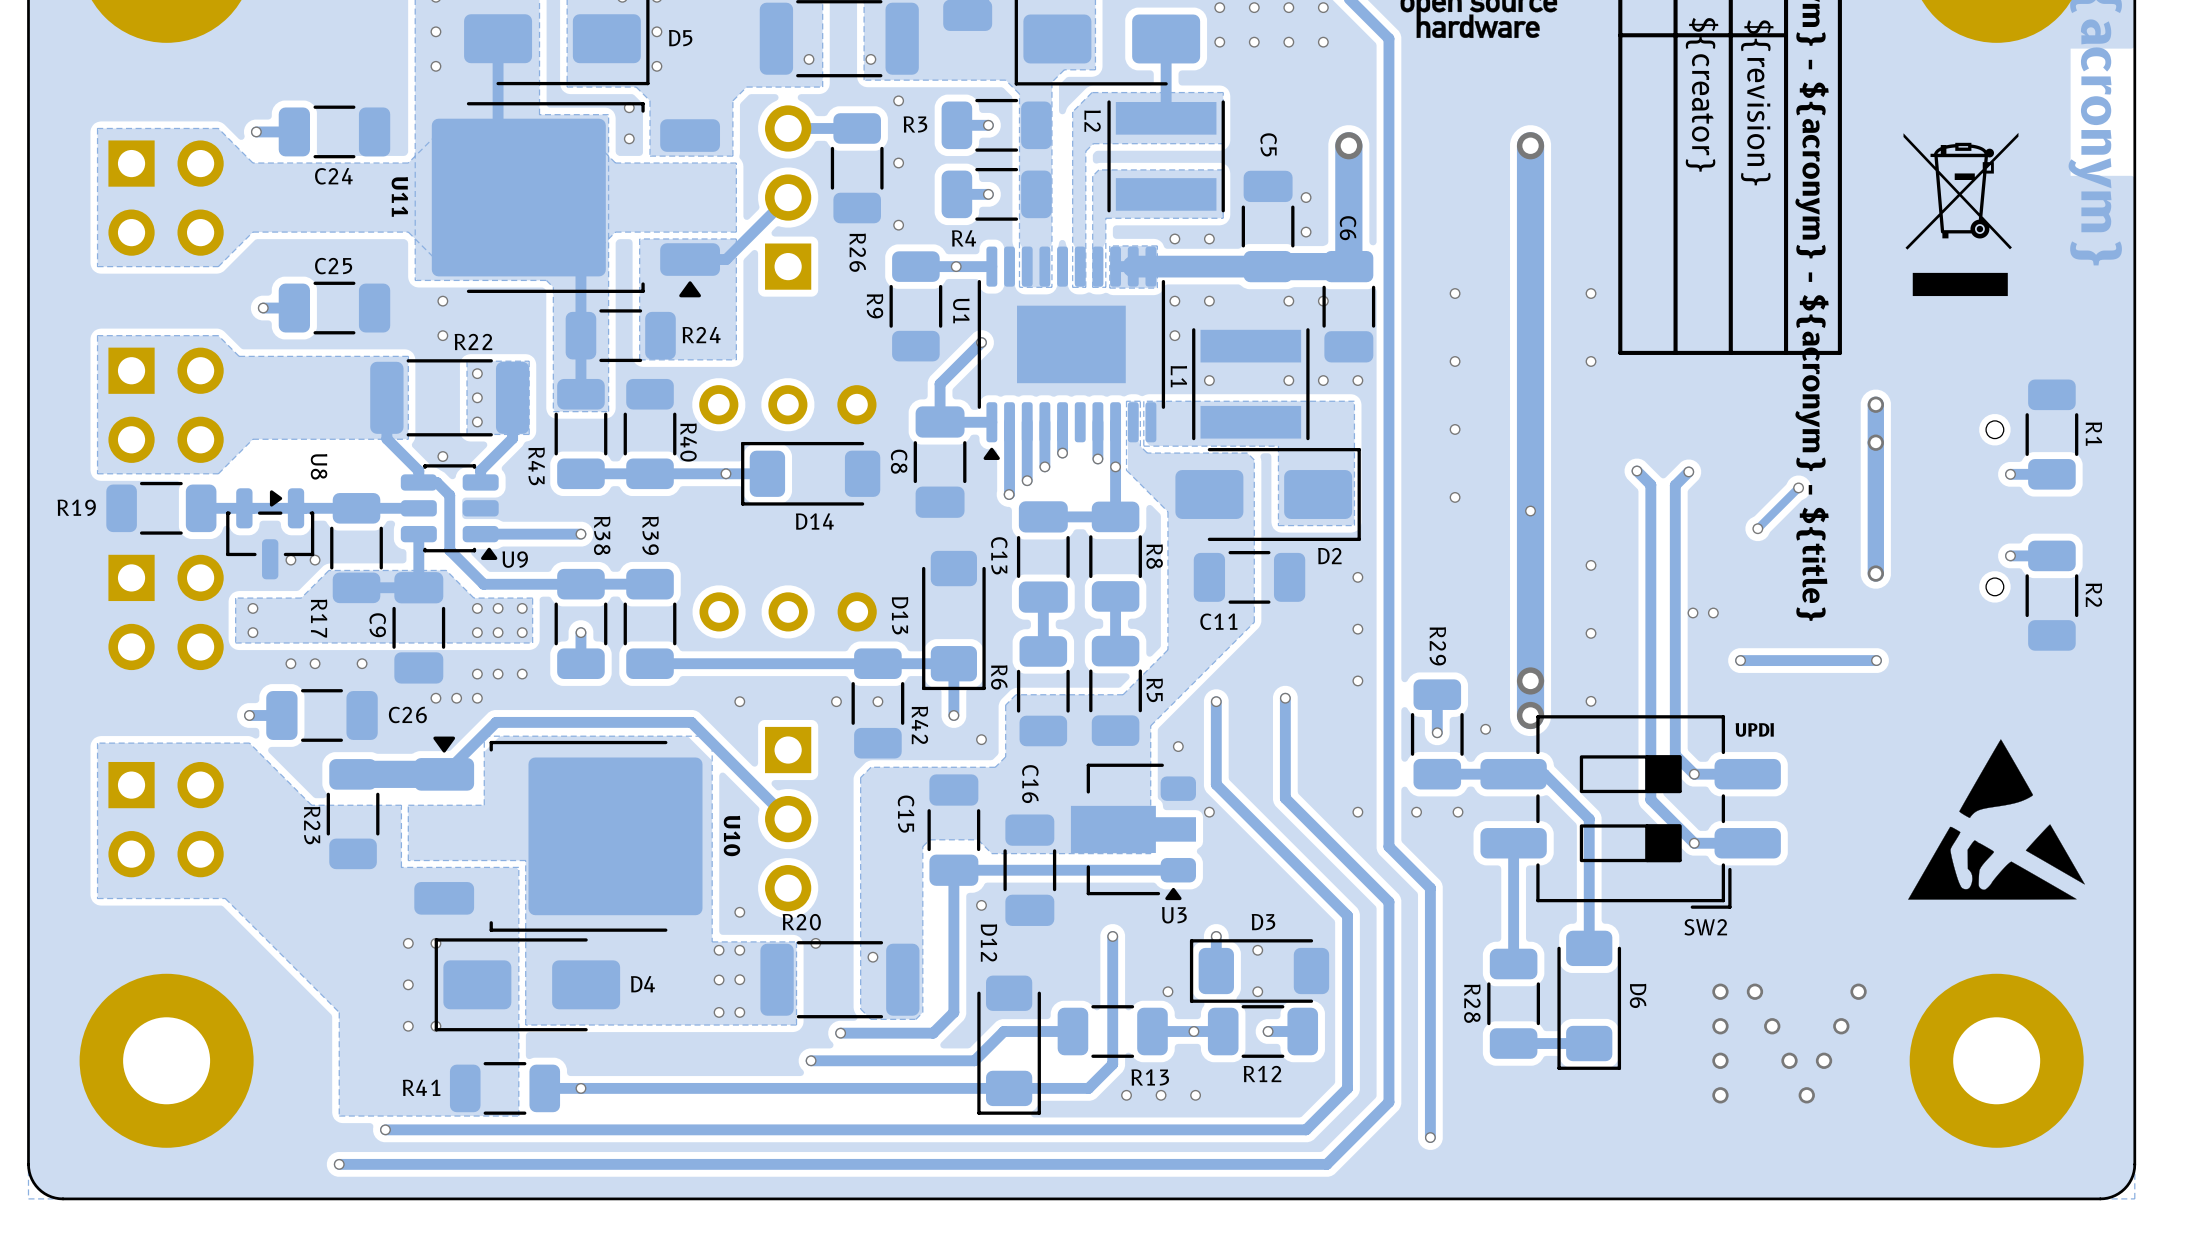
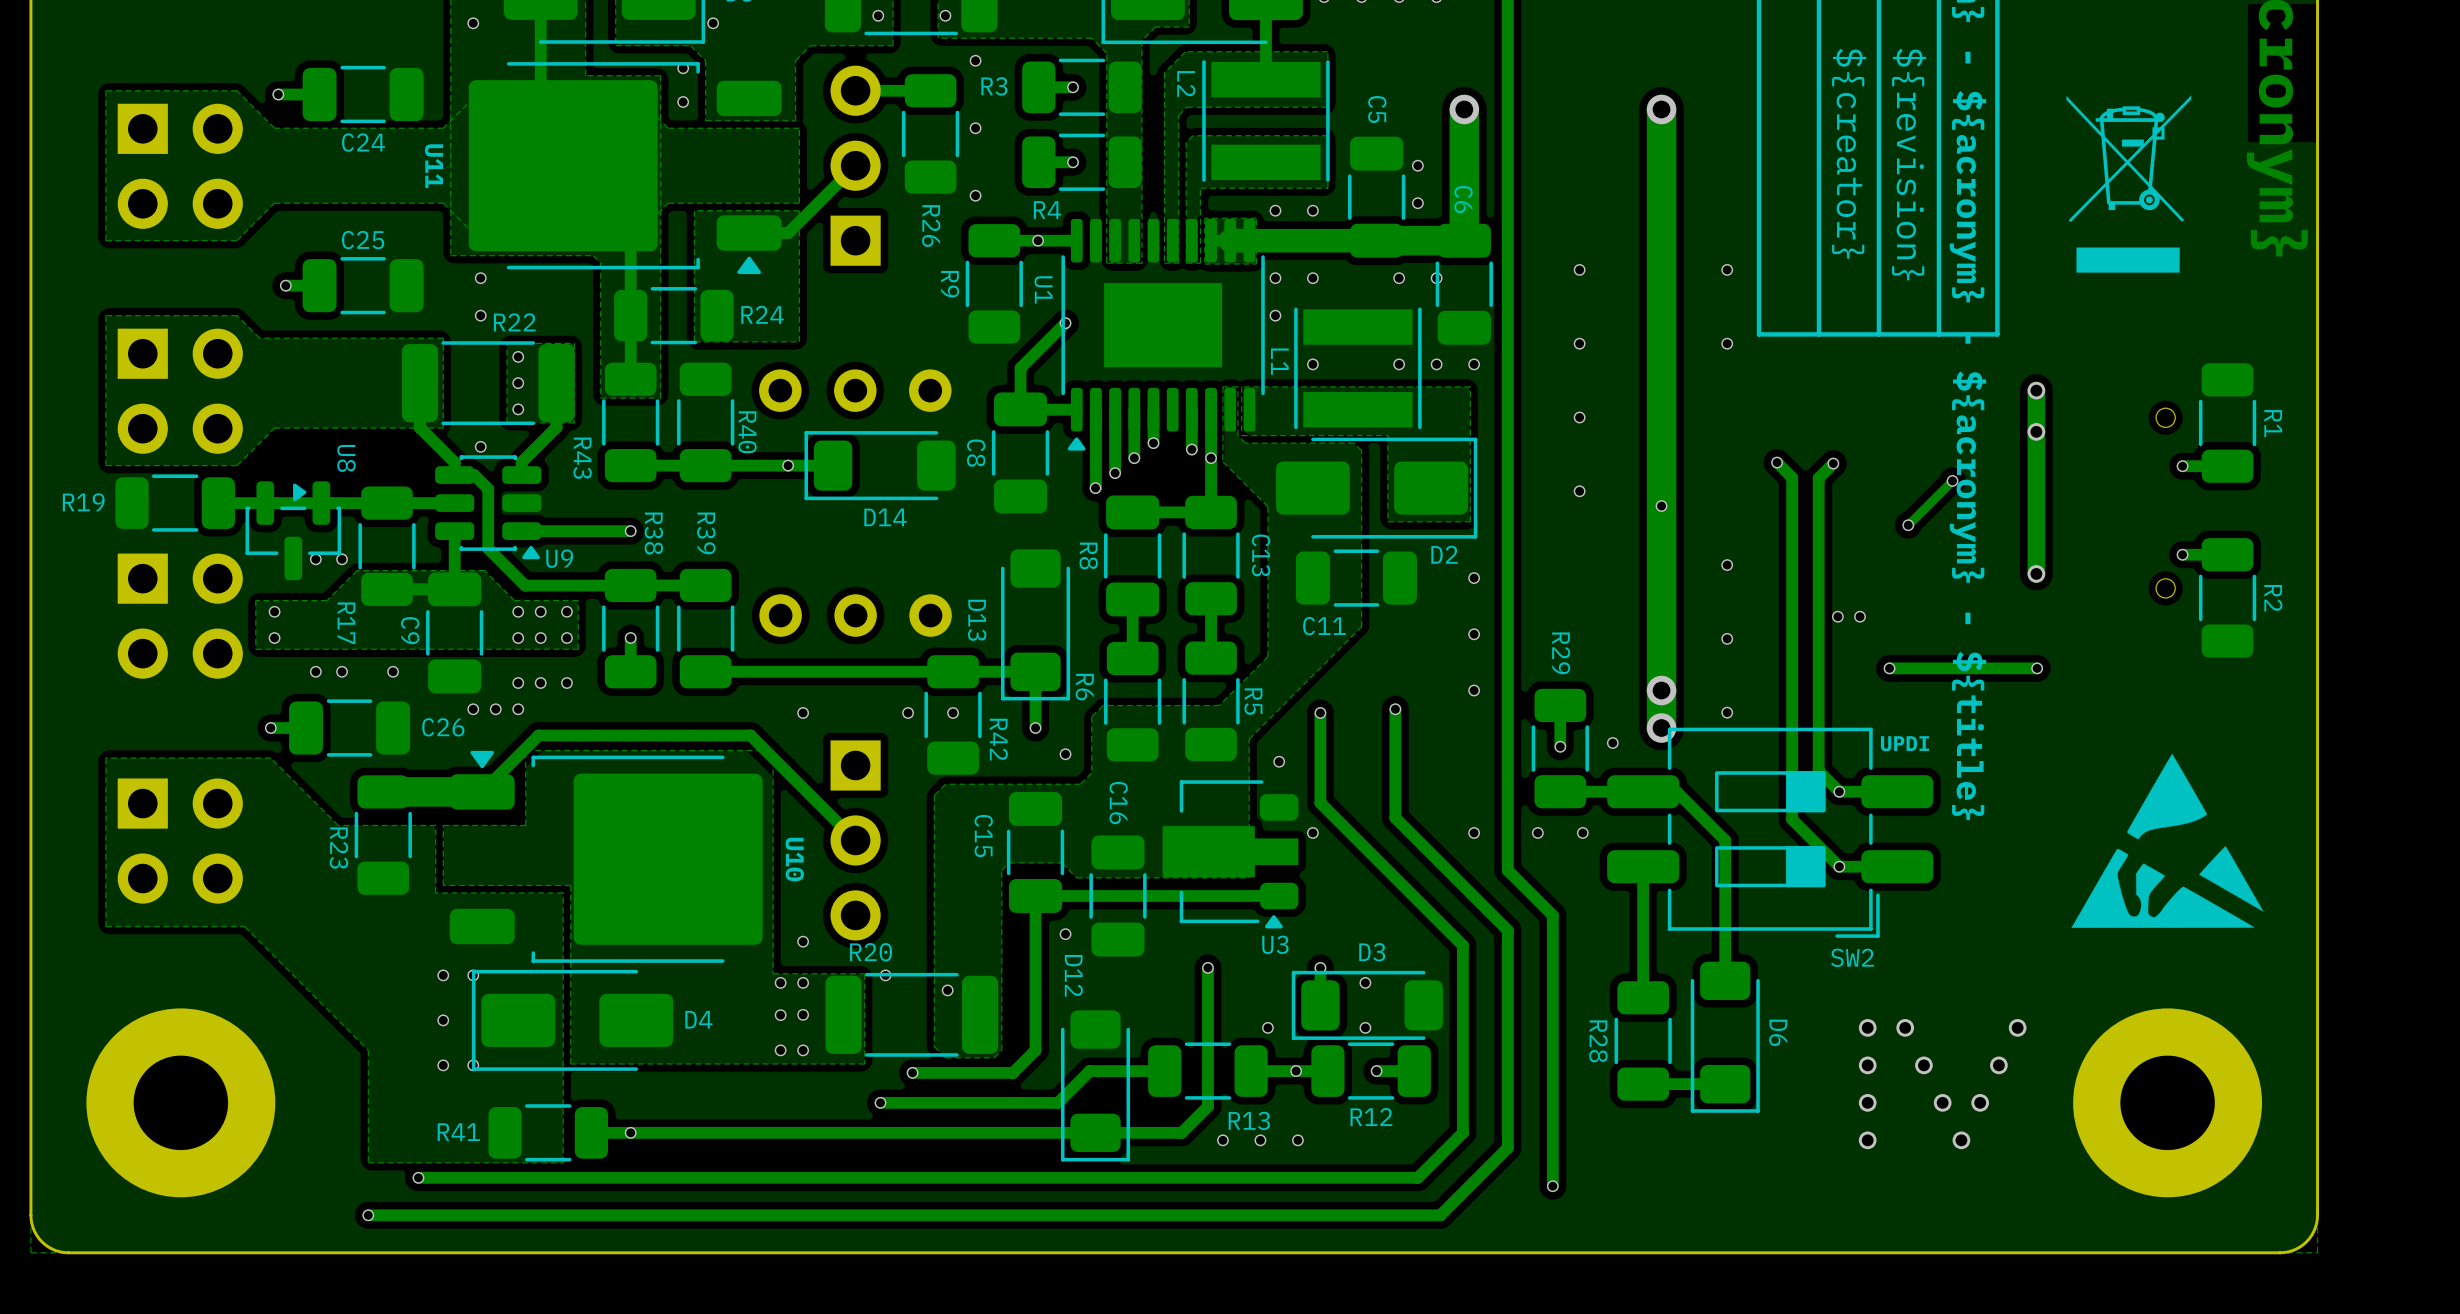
C13 name position: C13 (999, 555) -> C13 (1261, 555)
R8 name position: R8 (1154, 556) -> R8 (1088, 556)

